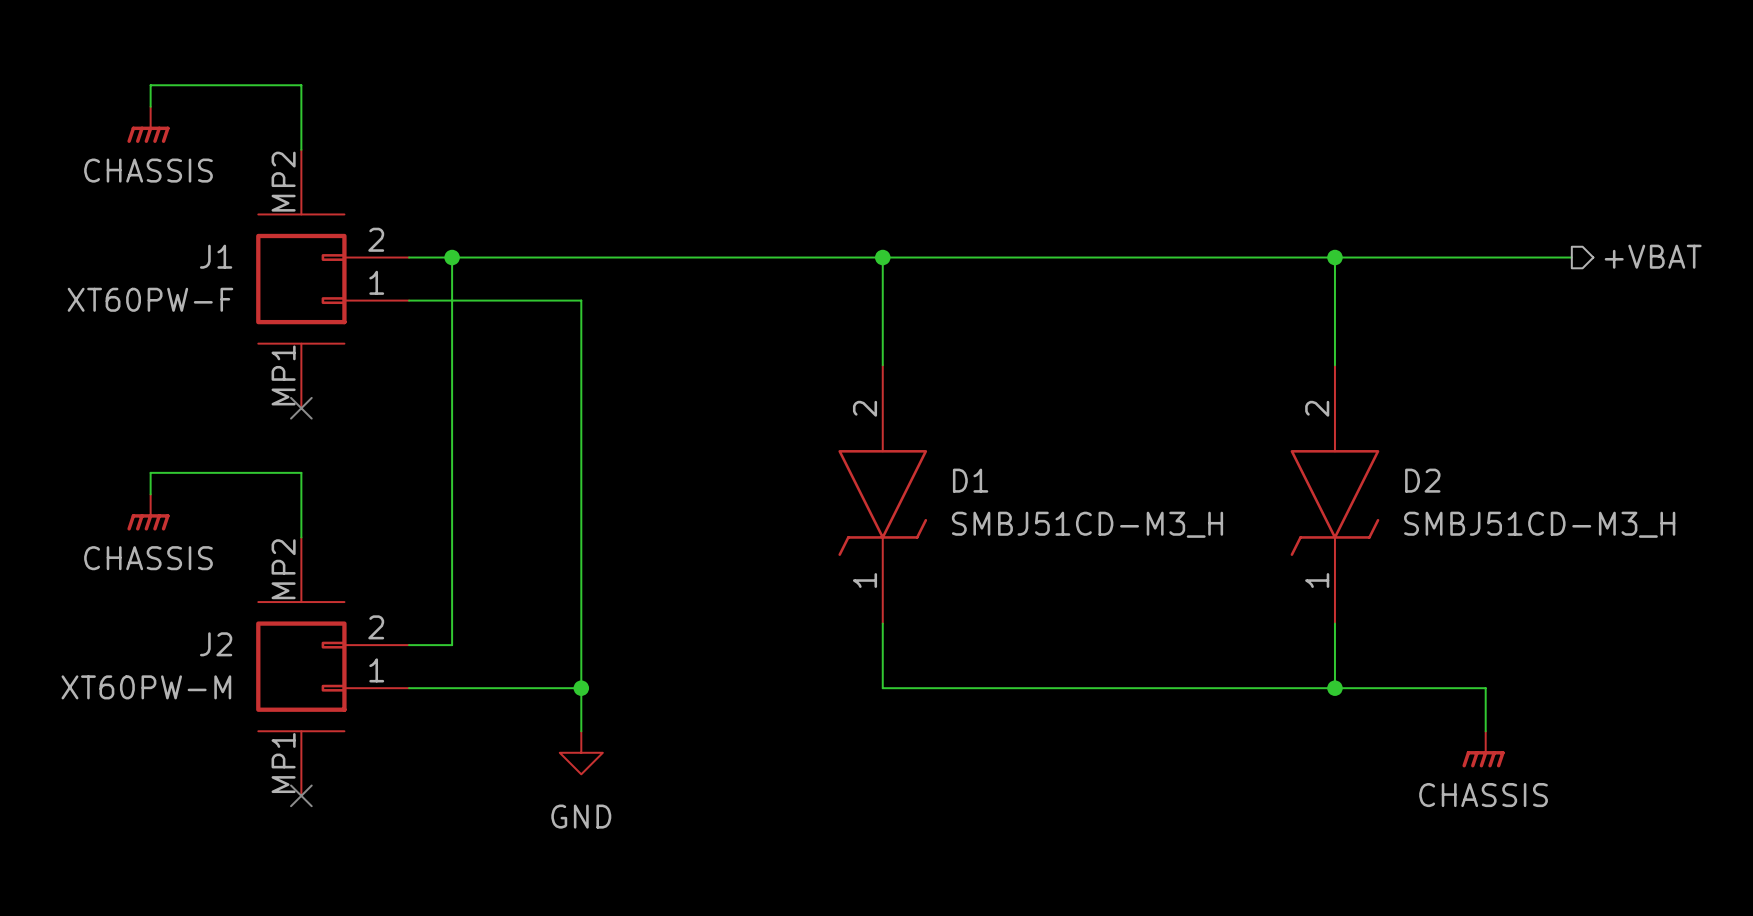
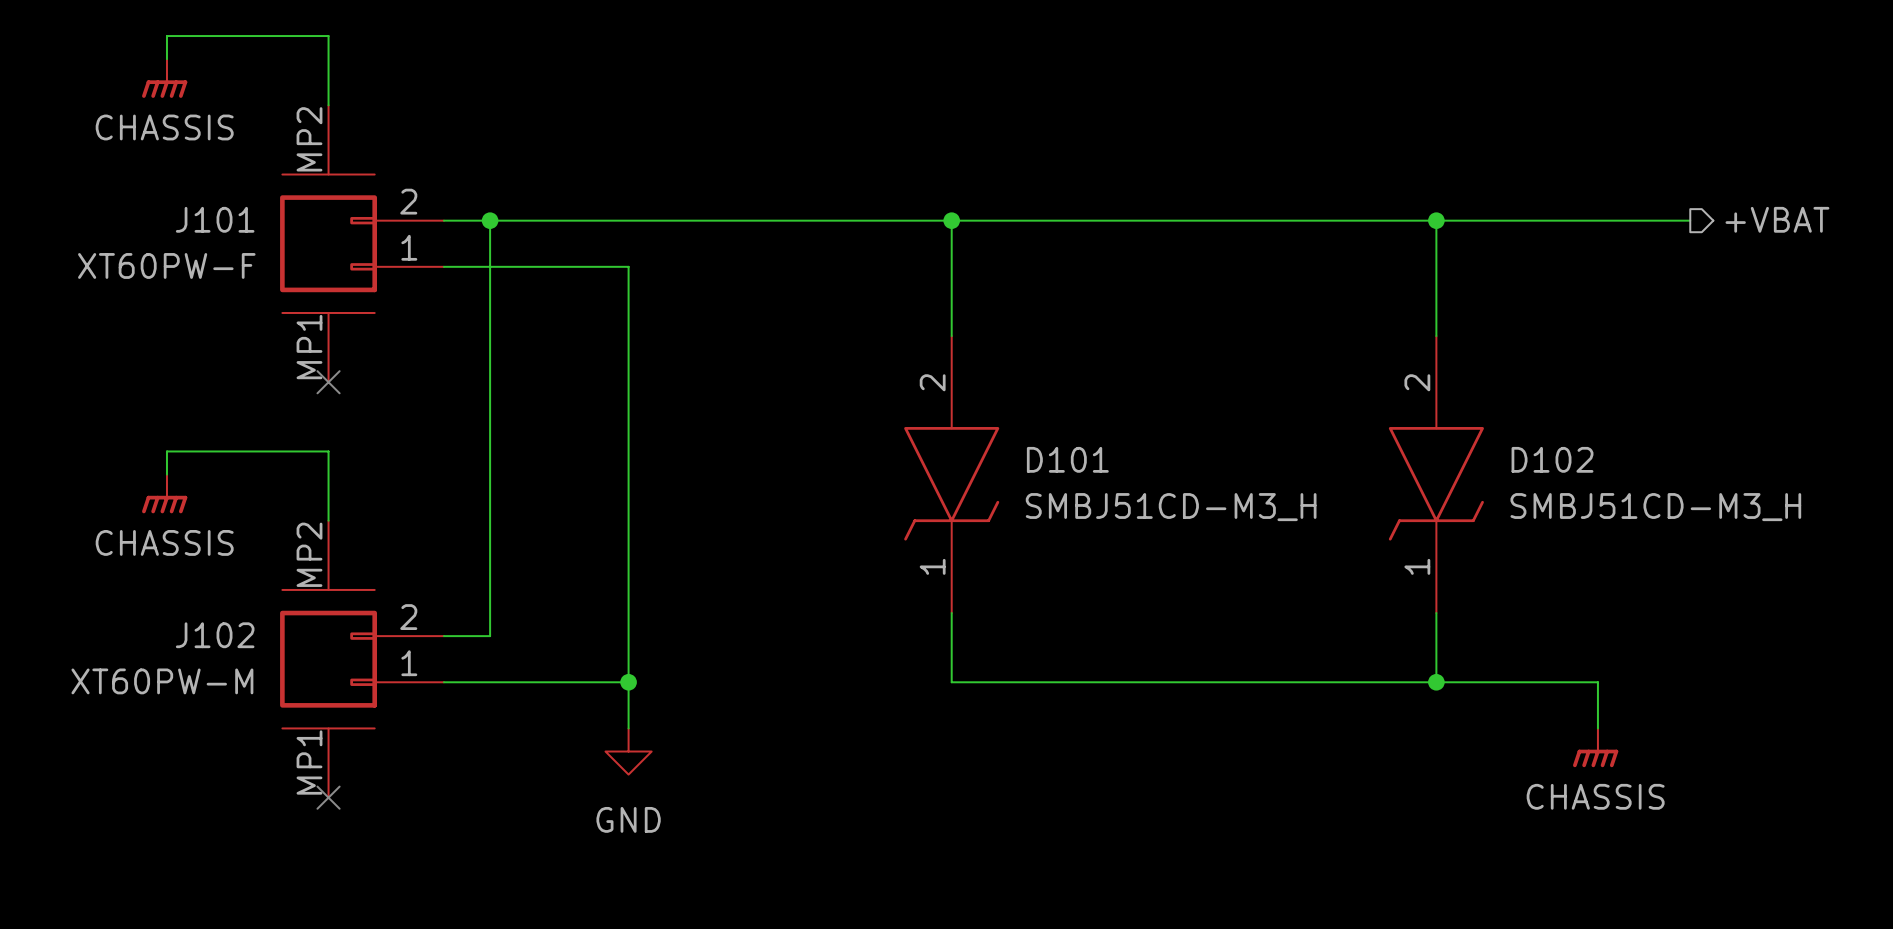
J1 name: J1 (216, 256) -> J101 (215, 219)
D1 name: D1 (970, 480) -> D101 (1067, 459)
D2 name: D2 (1422, 480) -> D102 (1552, 459)
J2 name: J2 (216, 644) -> J102 (215, 635)

